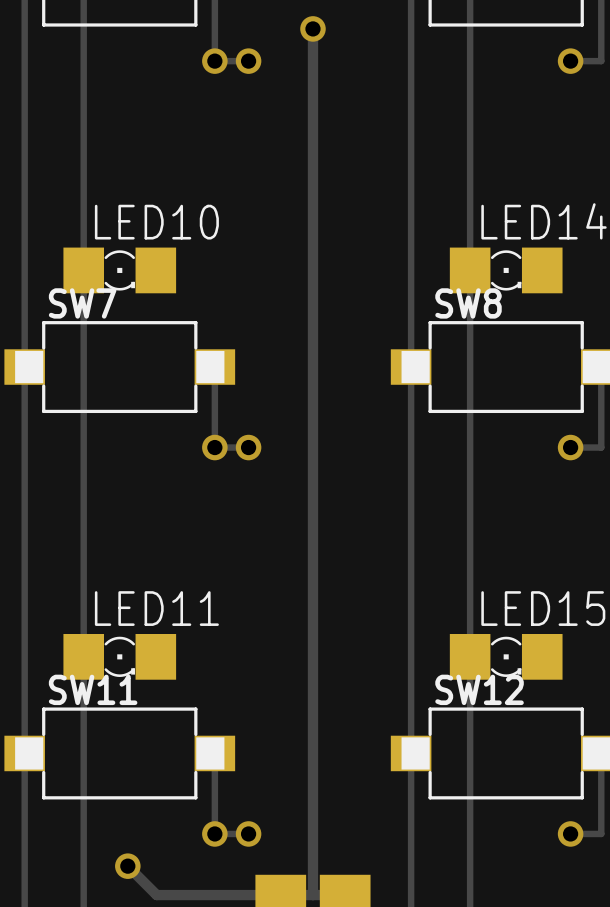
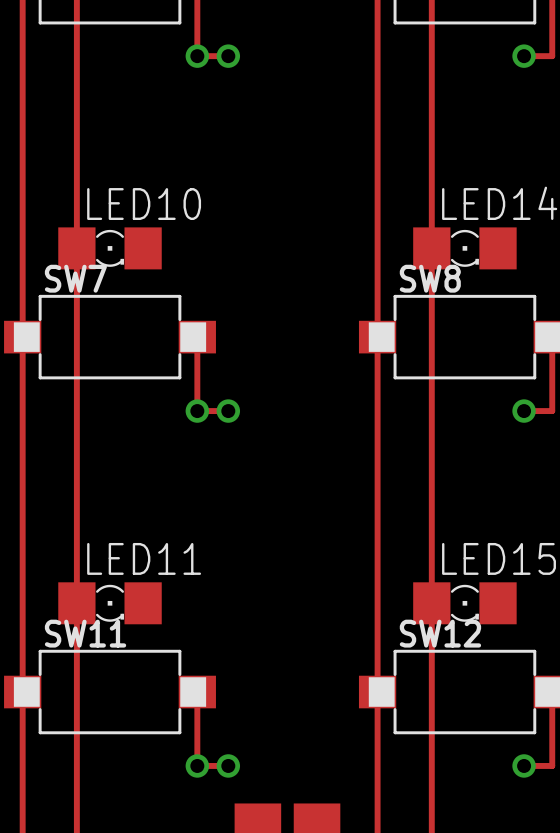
track: (312, 28) (312, 895) -> none
via: (312, 28) -> none
track: (127, 866) (156, 895) (345, 895) -> none
via: (127, 866) -> none

